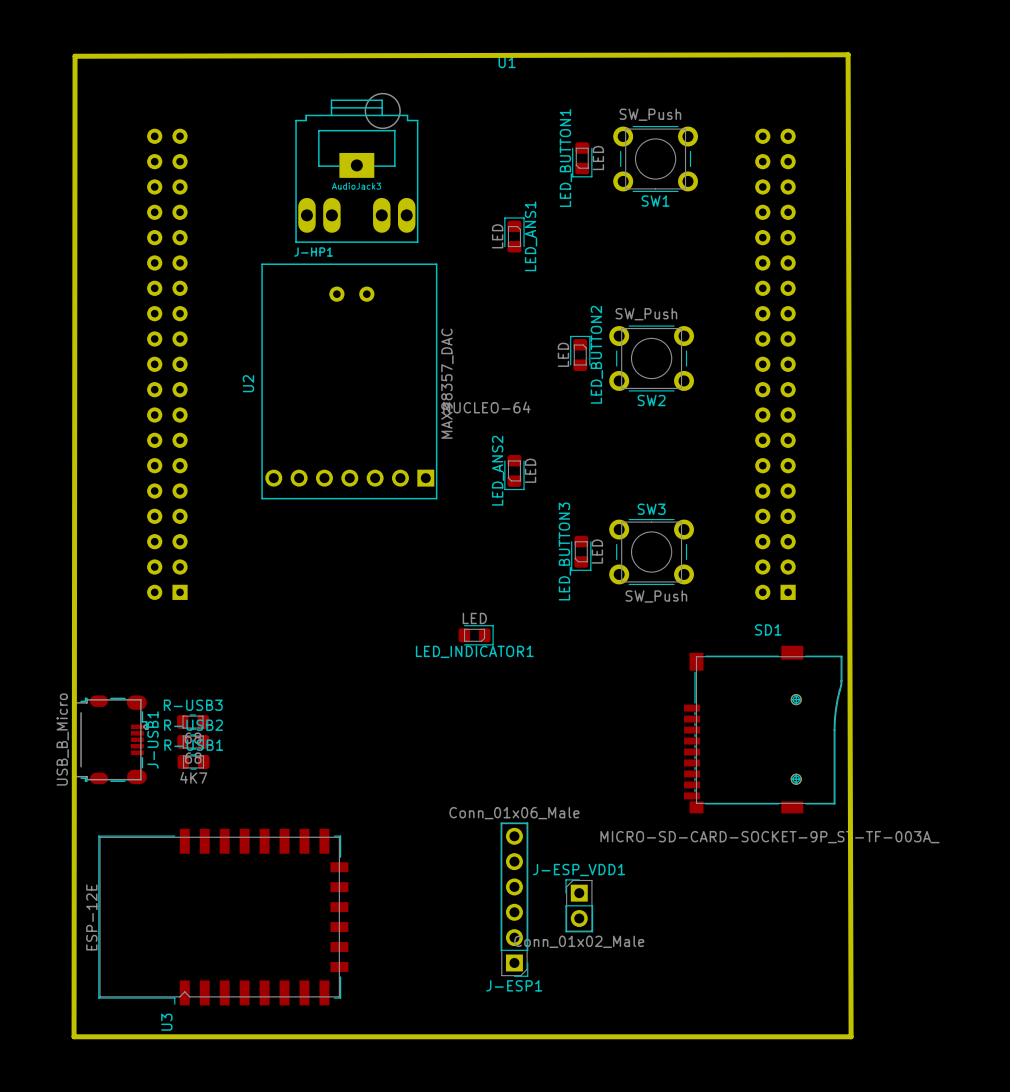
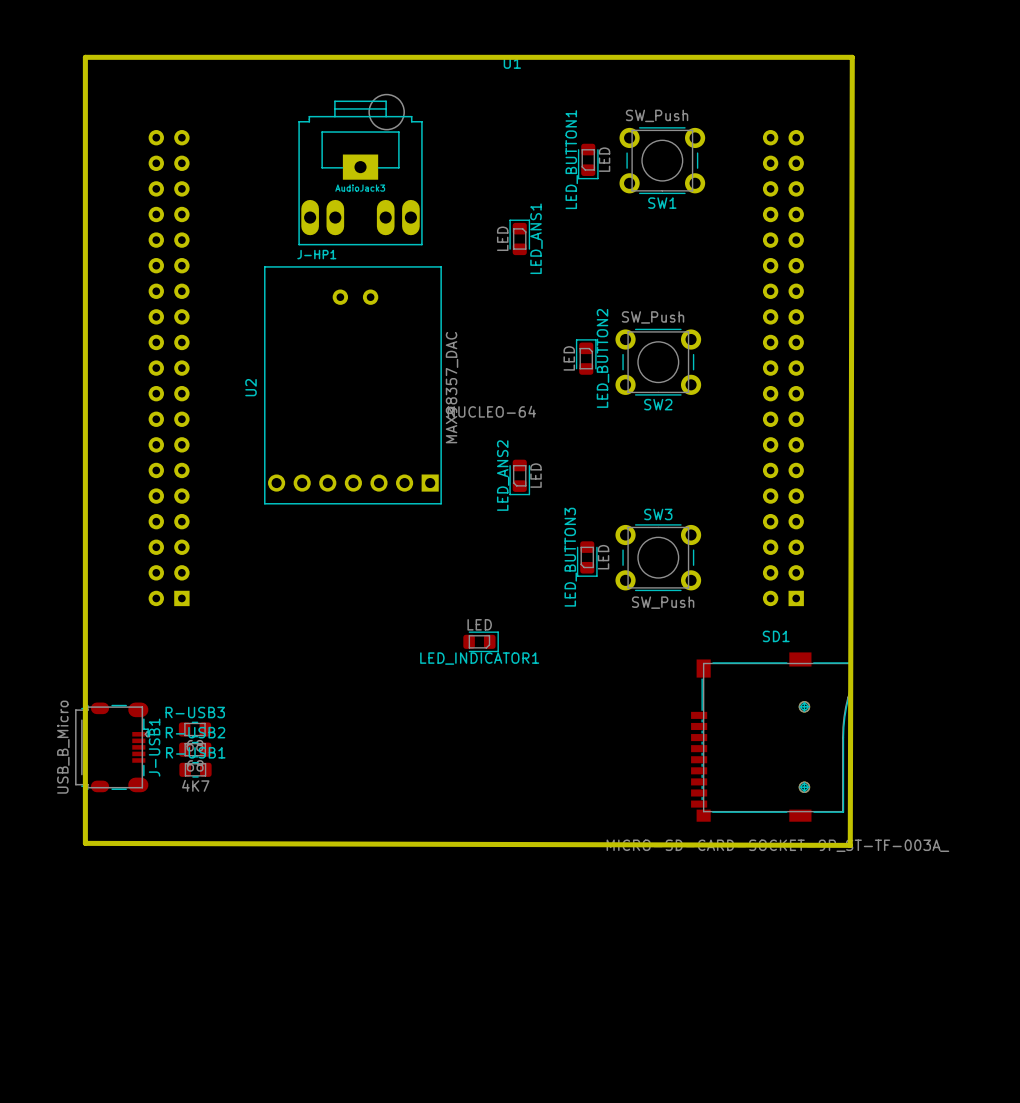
board edge: (848, 54) (851, 1036) (74, 1036) (75, 56) (848, 54) -> (85, 57) (85, 843) (850, 845) (852, 57) (85, 57)
J-ESP1: Conn_01x06_Male (514, 899) -> none
J-ESP_VDD1: Conn_01x02_Male (579, 905) -> none
U3: ESP-12E (223, 917) -> none

